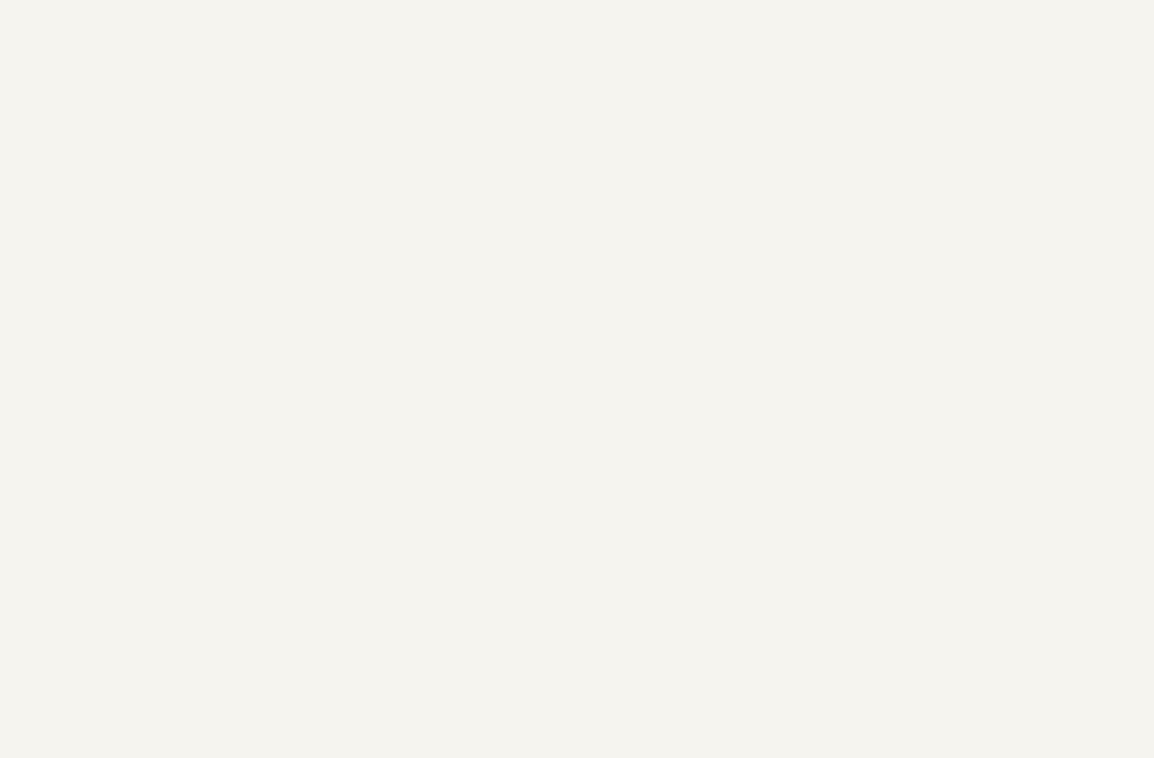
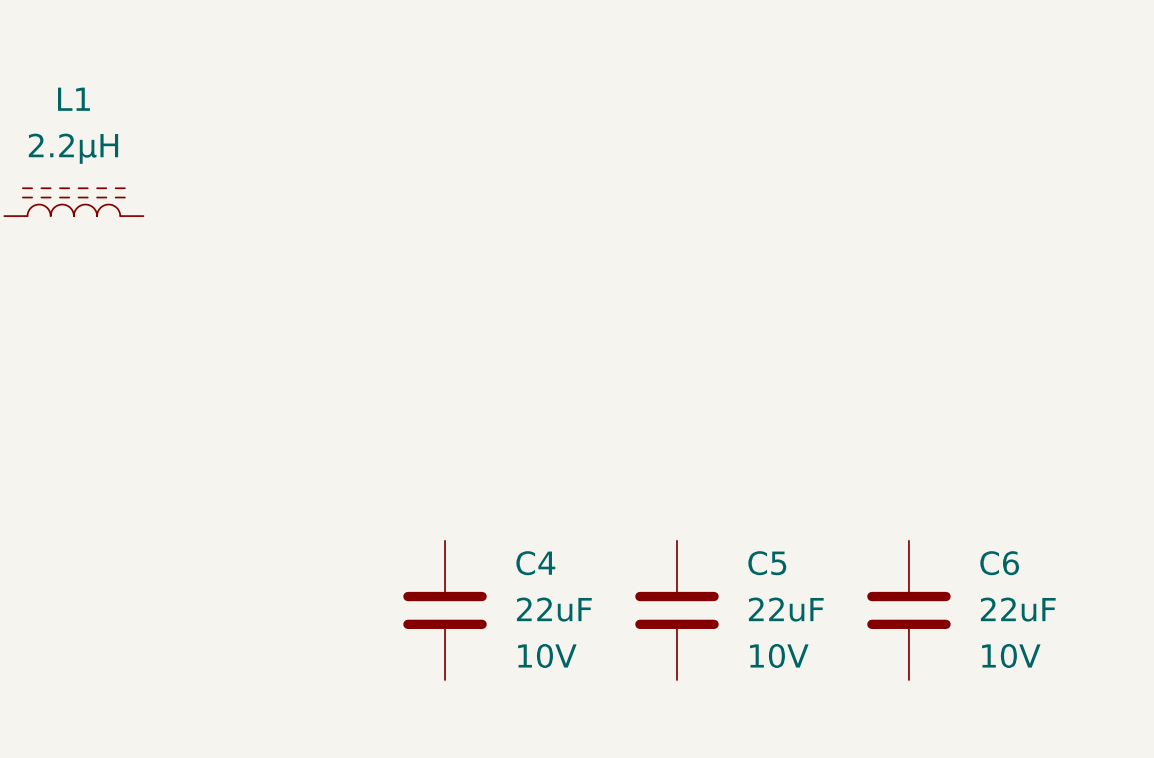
L1: none -> 2.2µH (73, 202)
C4: none -> 22uF (445, 610)
C5: none -> 22uF (676, 610)
C6: none -> 22uF (908, 610)

